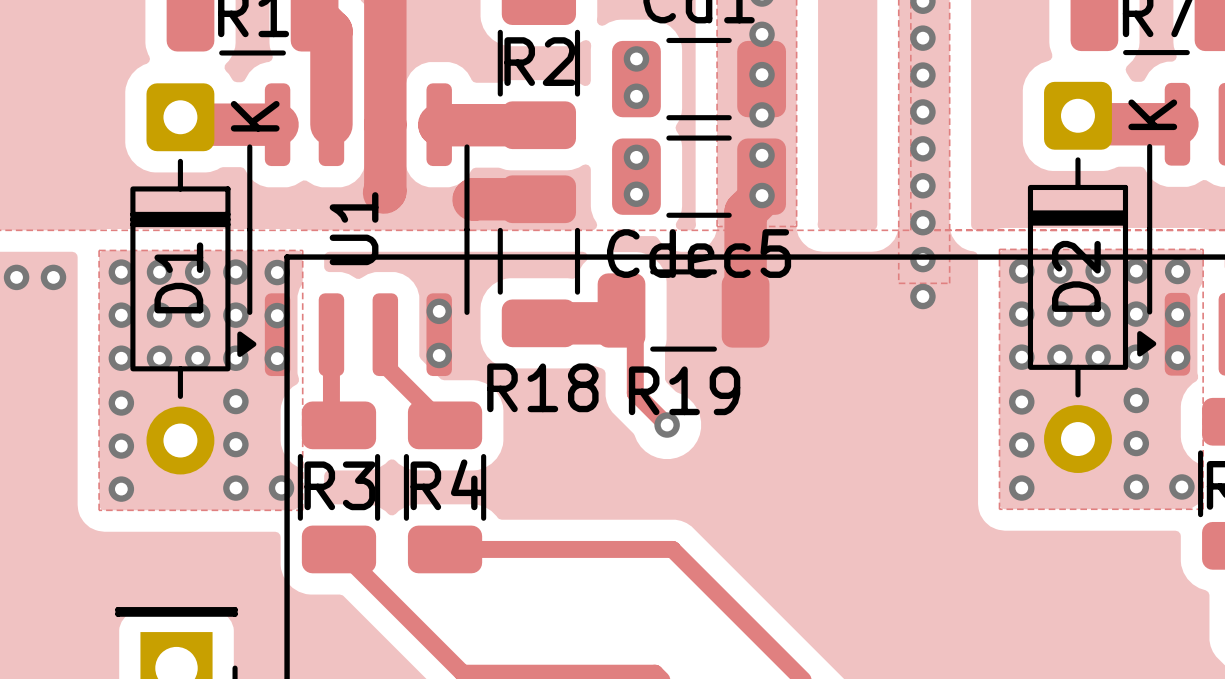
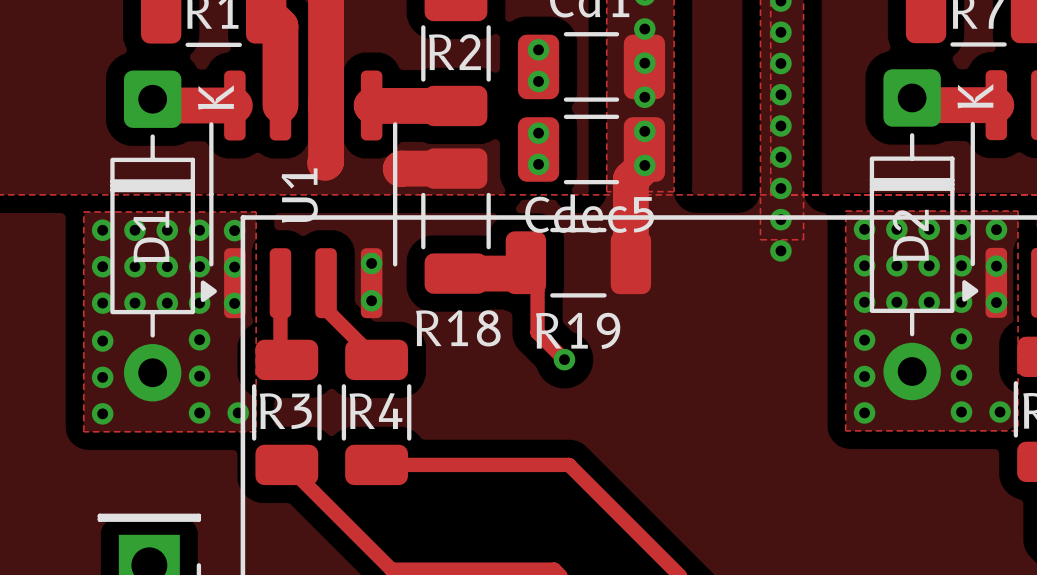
via: (16, 277) -> none
via: (53, 277) -> none

